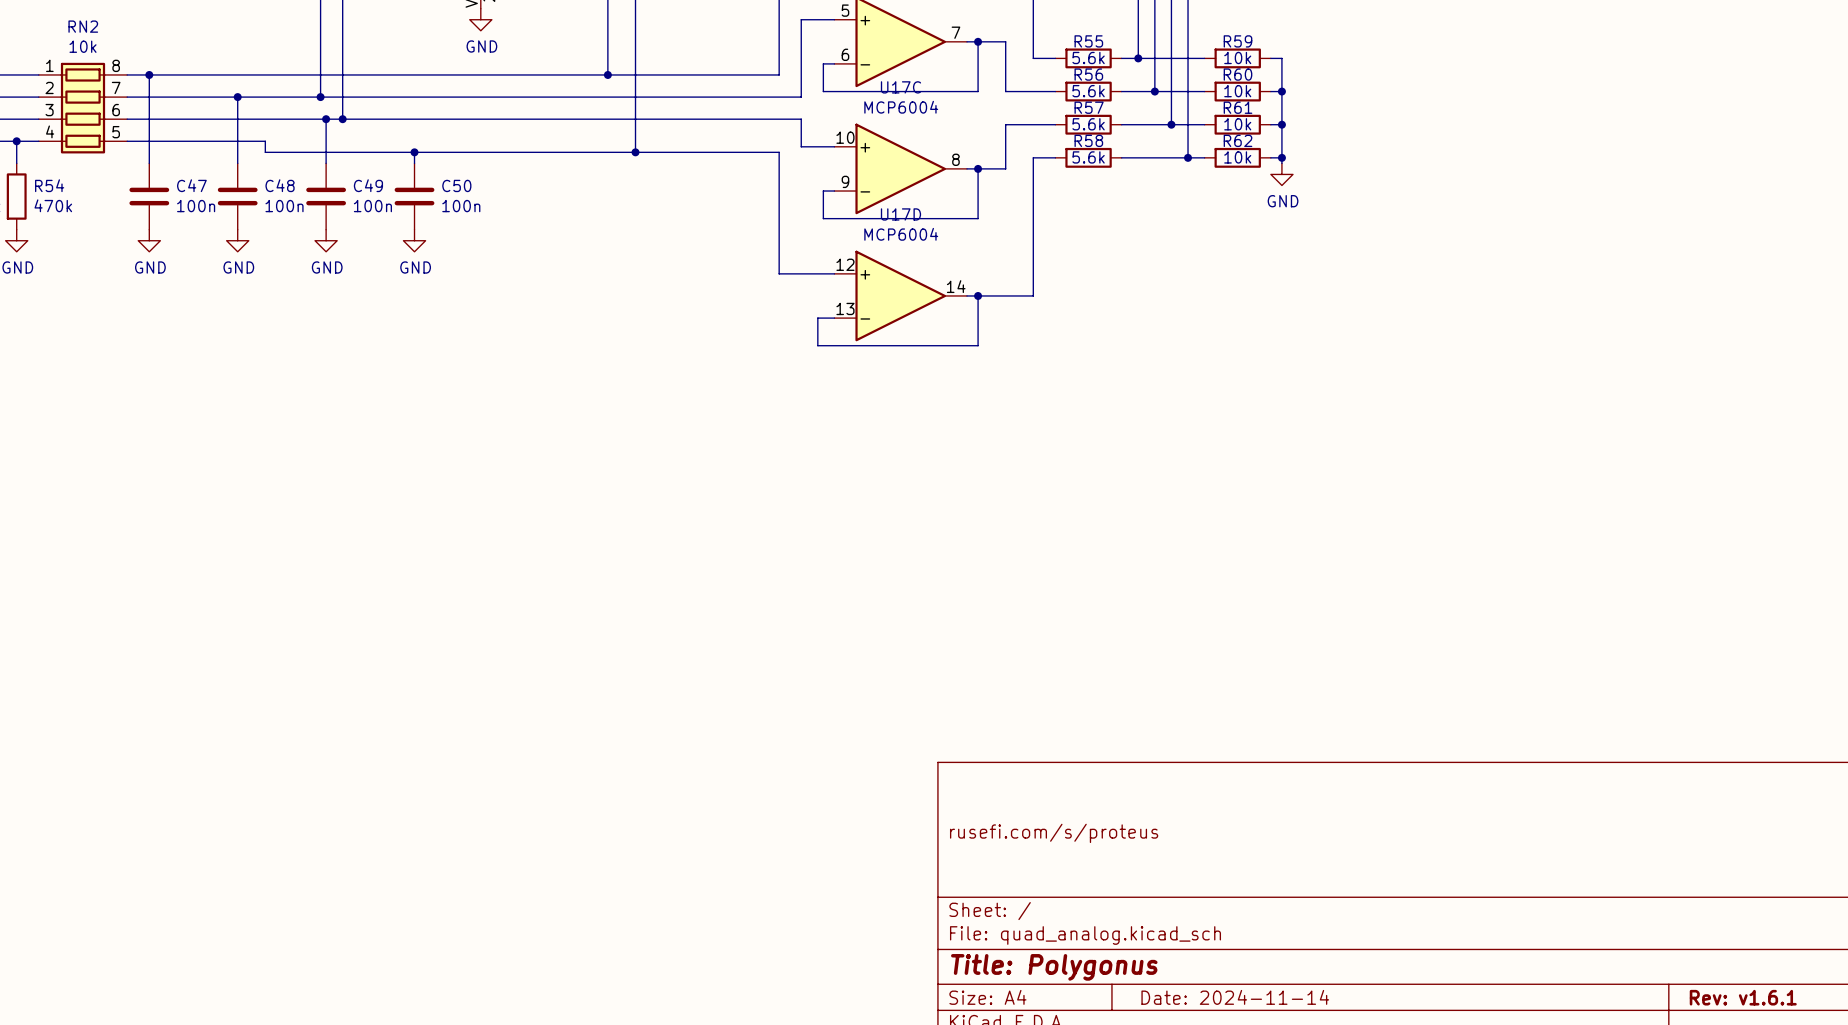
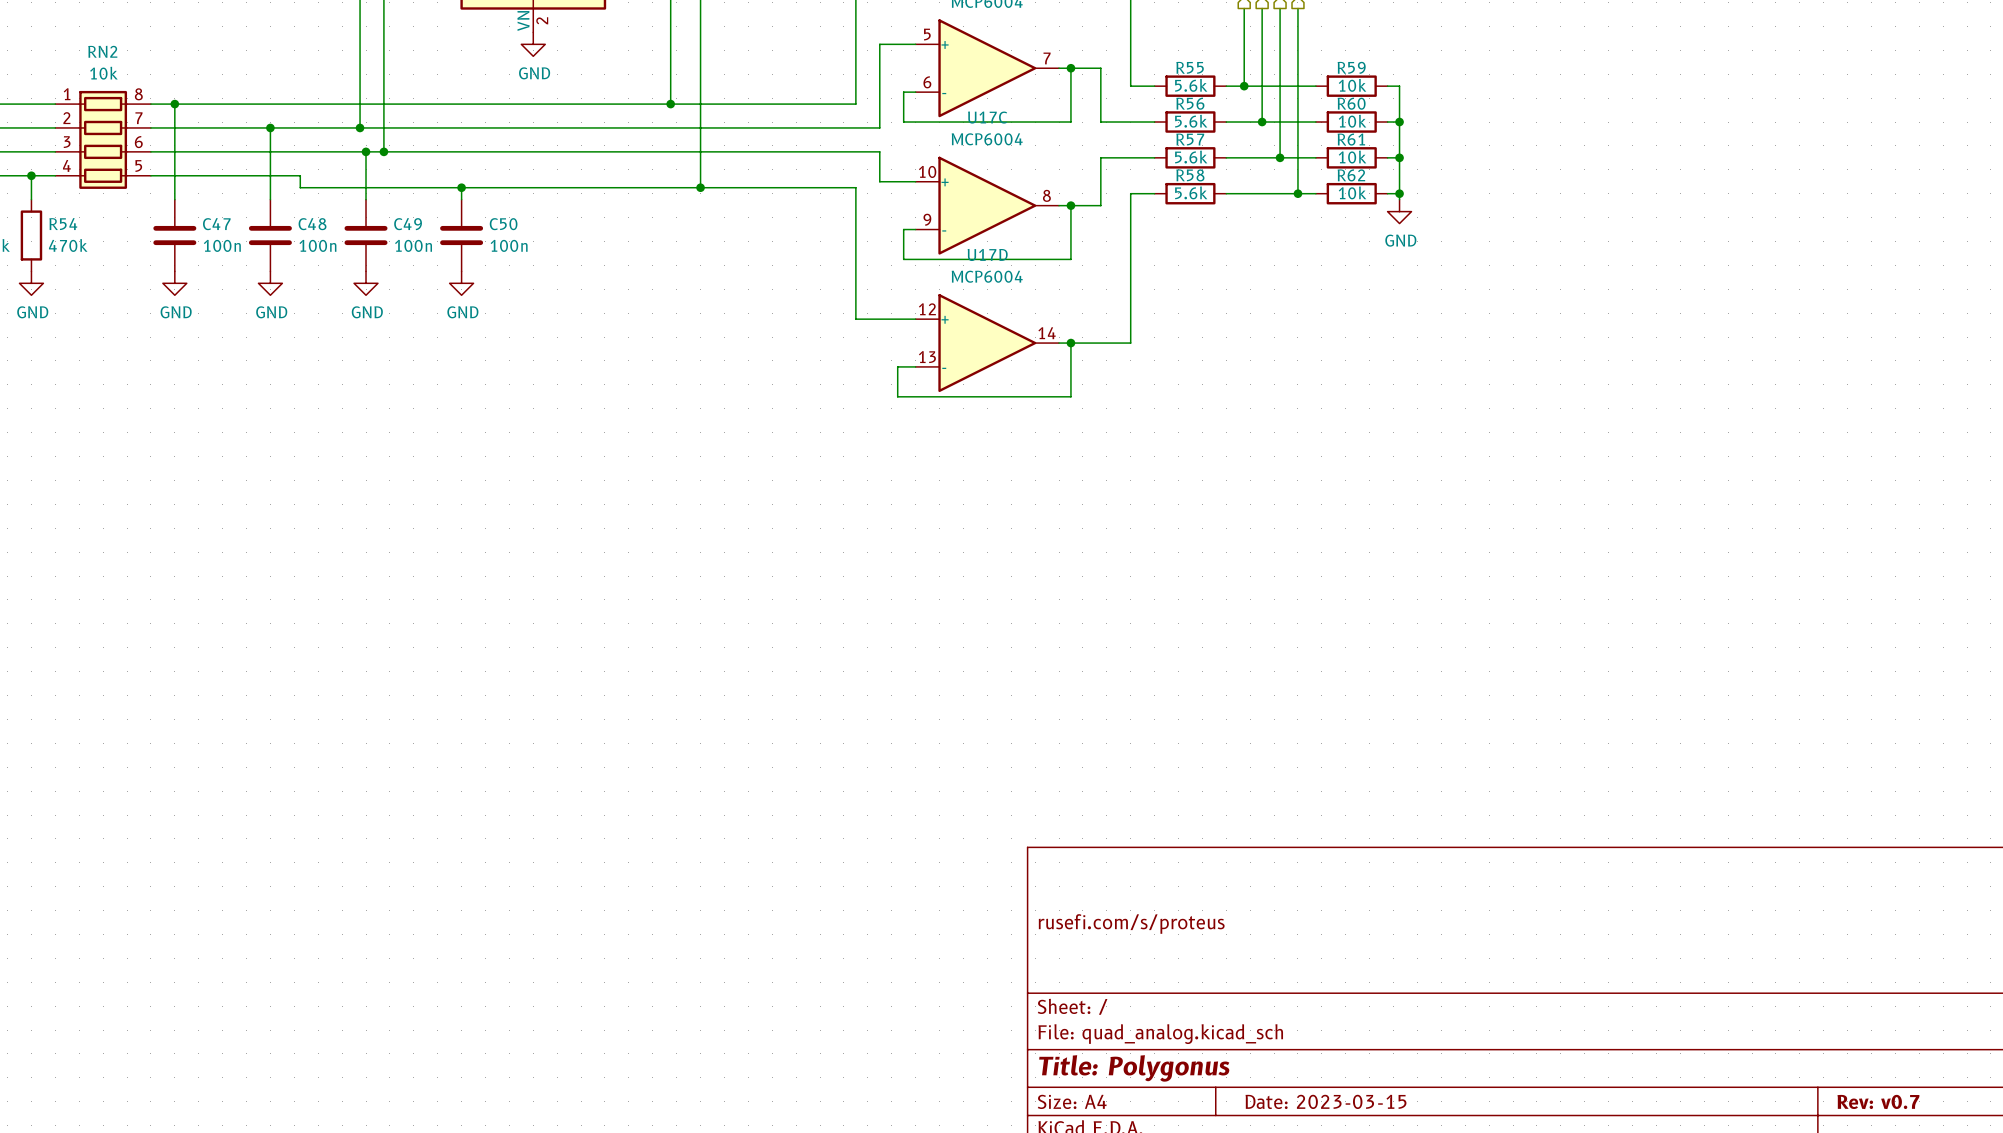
title block: Date: 2024-11-14 (1235, 997) -> Date: 2023-03-15 (1326, 1101)
title block: Rev: v1.6.1 (1743, 997) -> Rev: v0.7 (1878, 1101)

